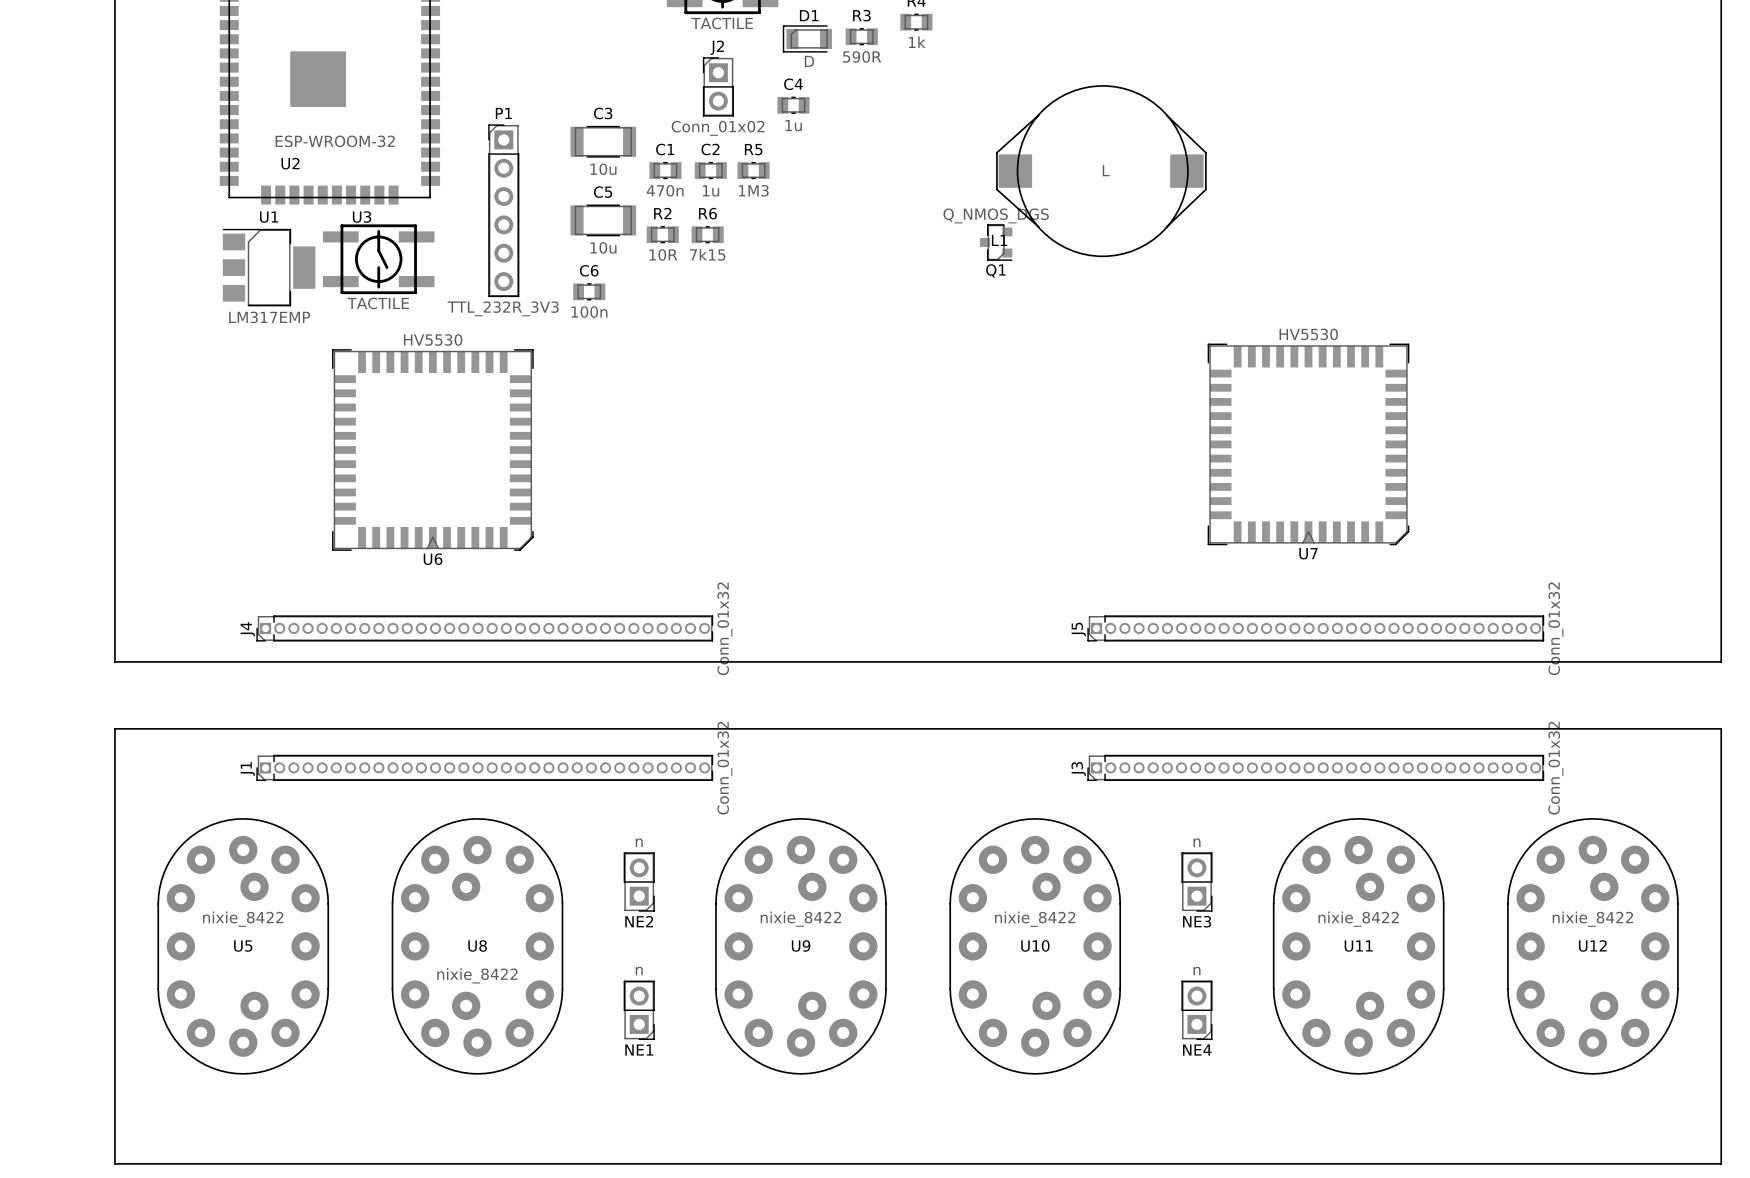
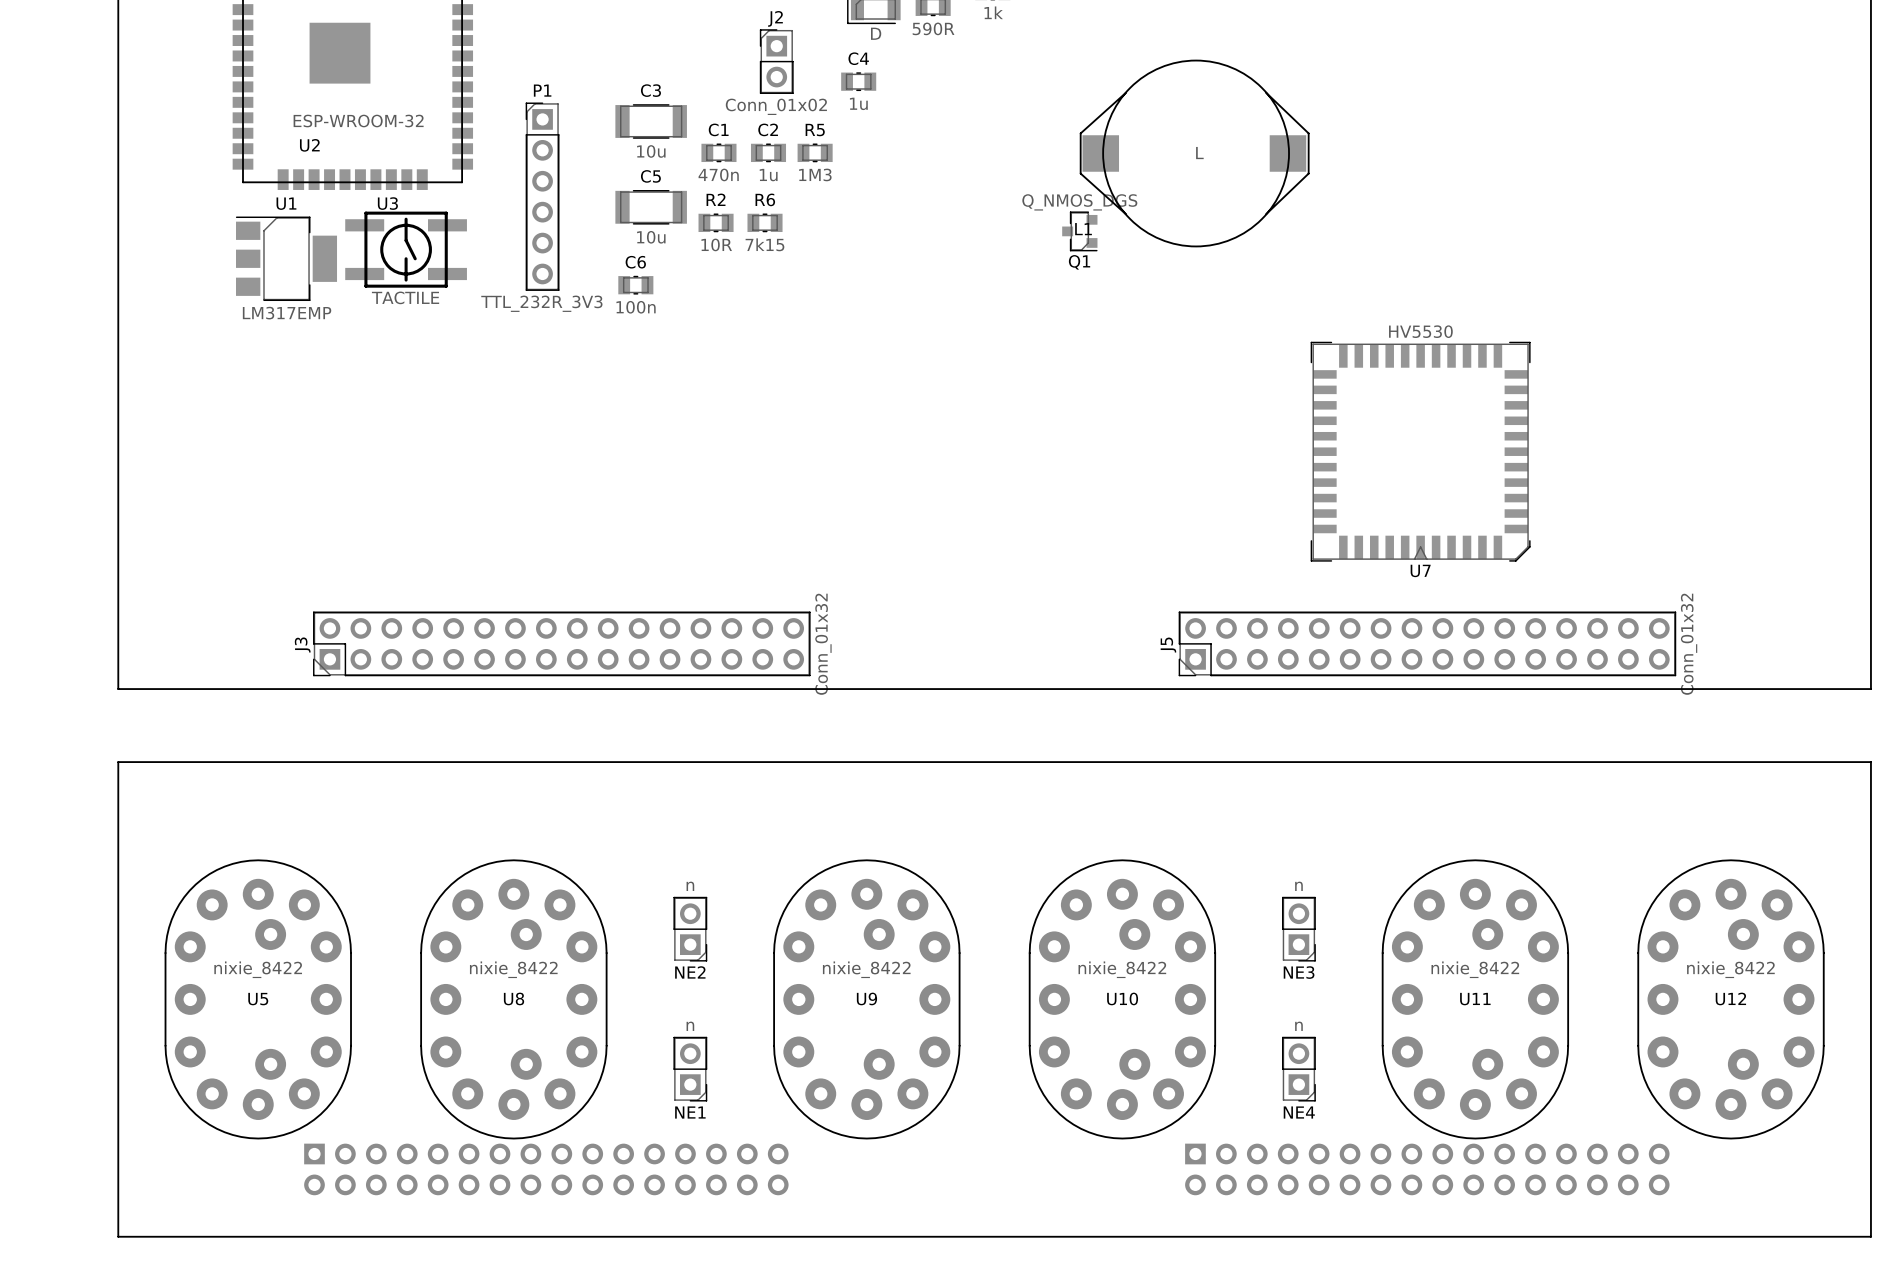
U6: HV5530 (432, 449) -> none
J5 footprint: [1087, 615, 1545, 642] -> [1178, 611, 1677, 677]
J4: Conn_01x32 (484, 628) -> none
J3 footprint: [1087, 754, 1545, 781] -> [313, 611, 811, 677]
J1: Conn_01x32 (484, 767) -> none
U8 rotation: 0° (477, 946) -> 180° (513, 999)
part: none -> (546, 1169)
part: none -> (1427, 1169)

